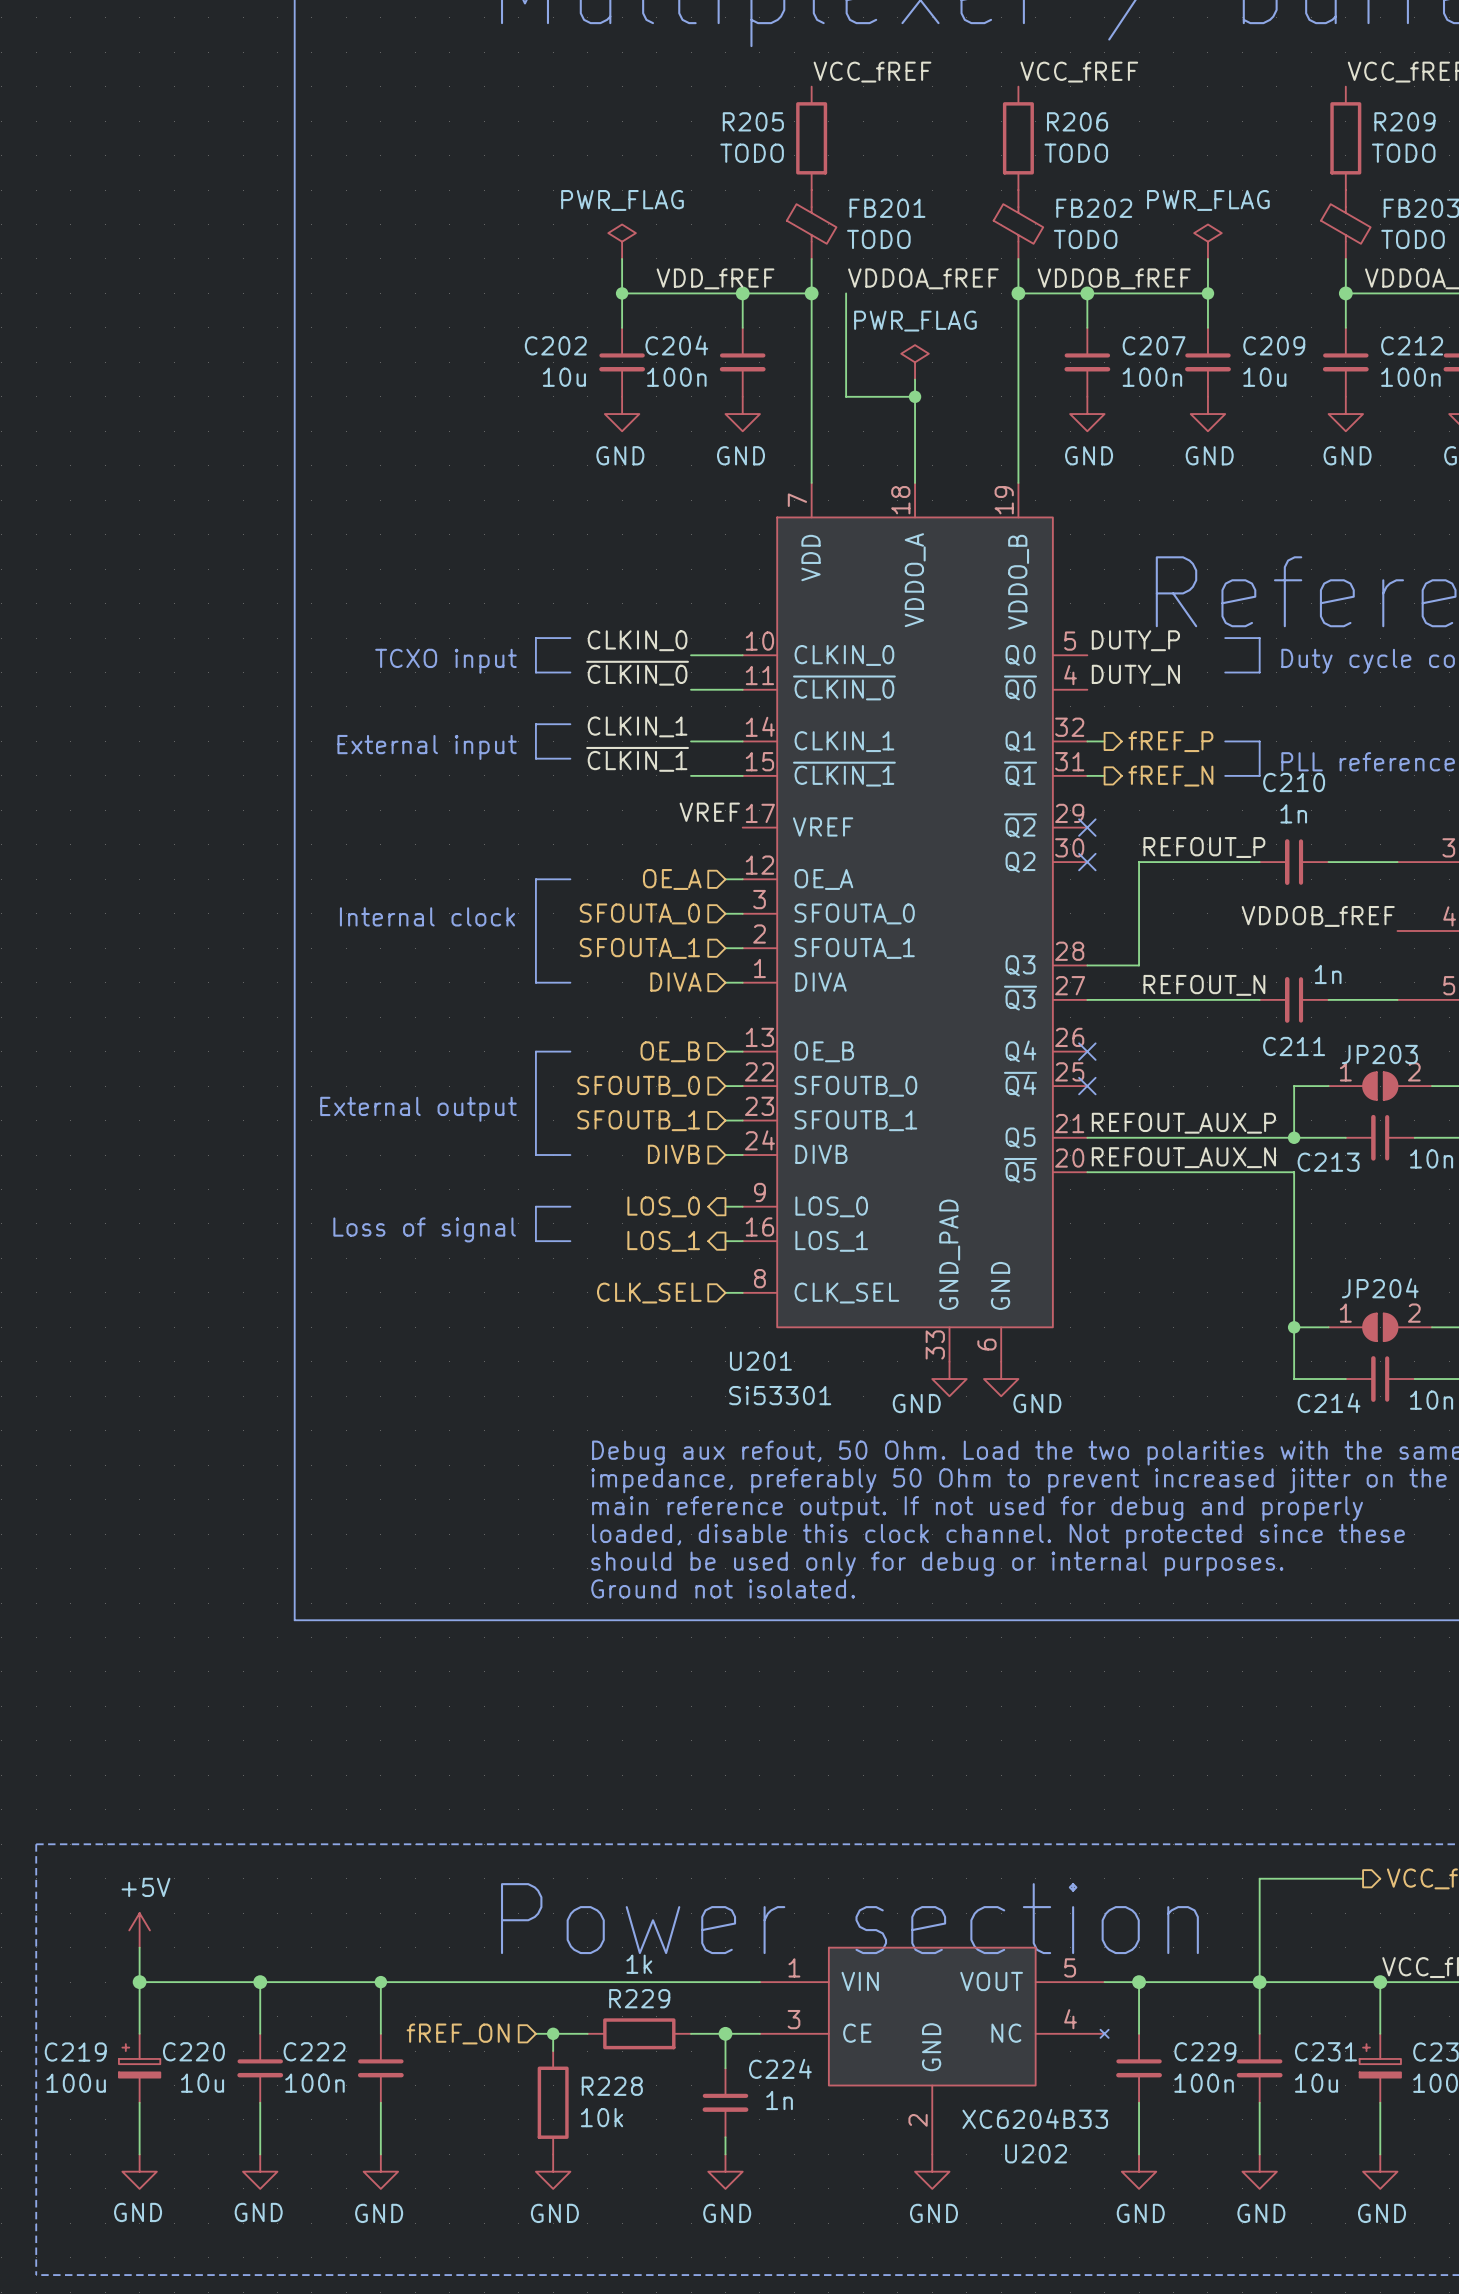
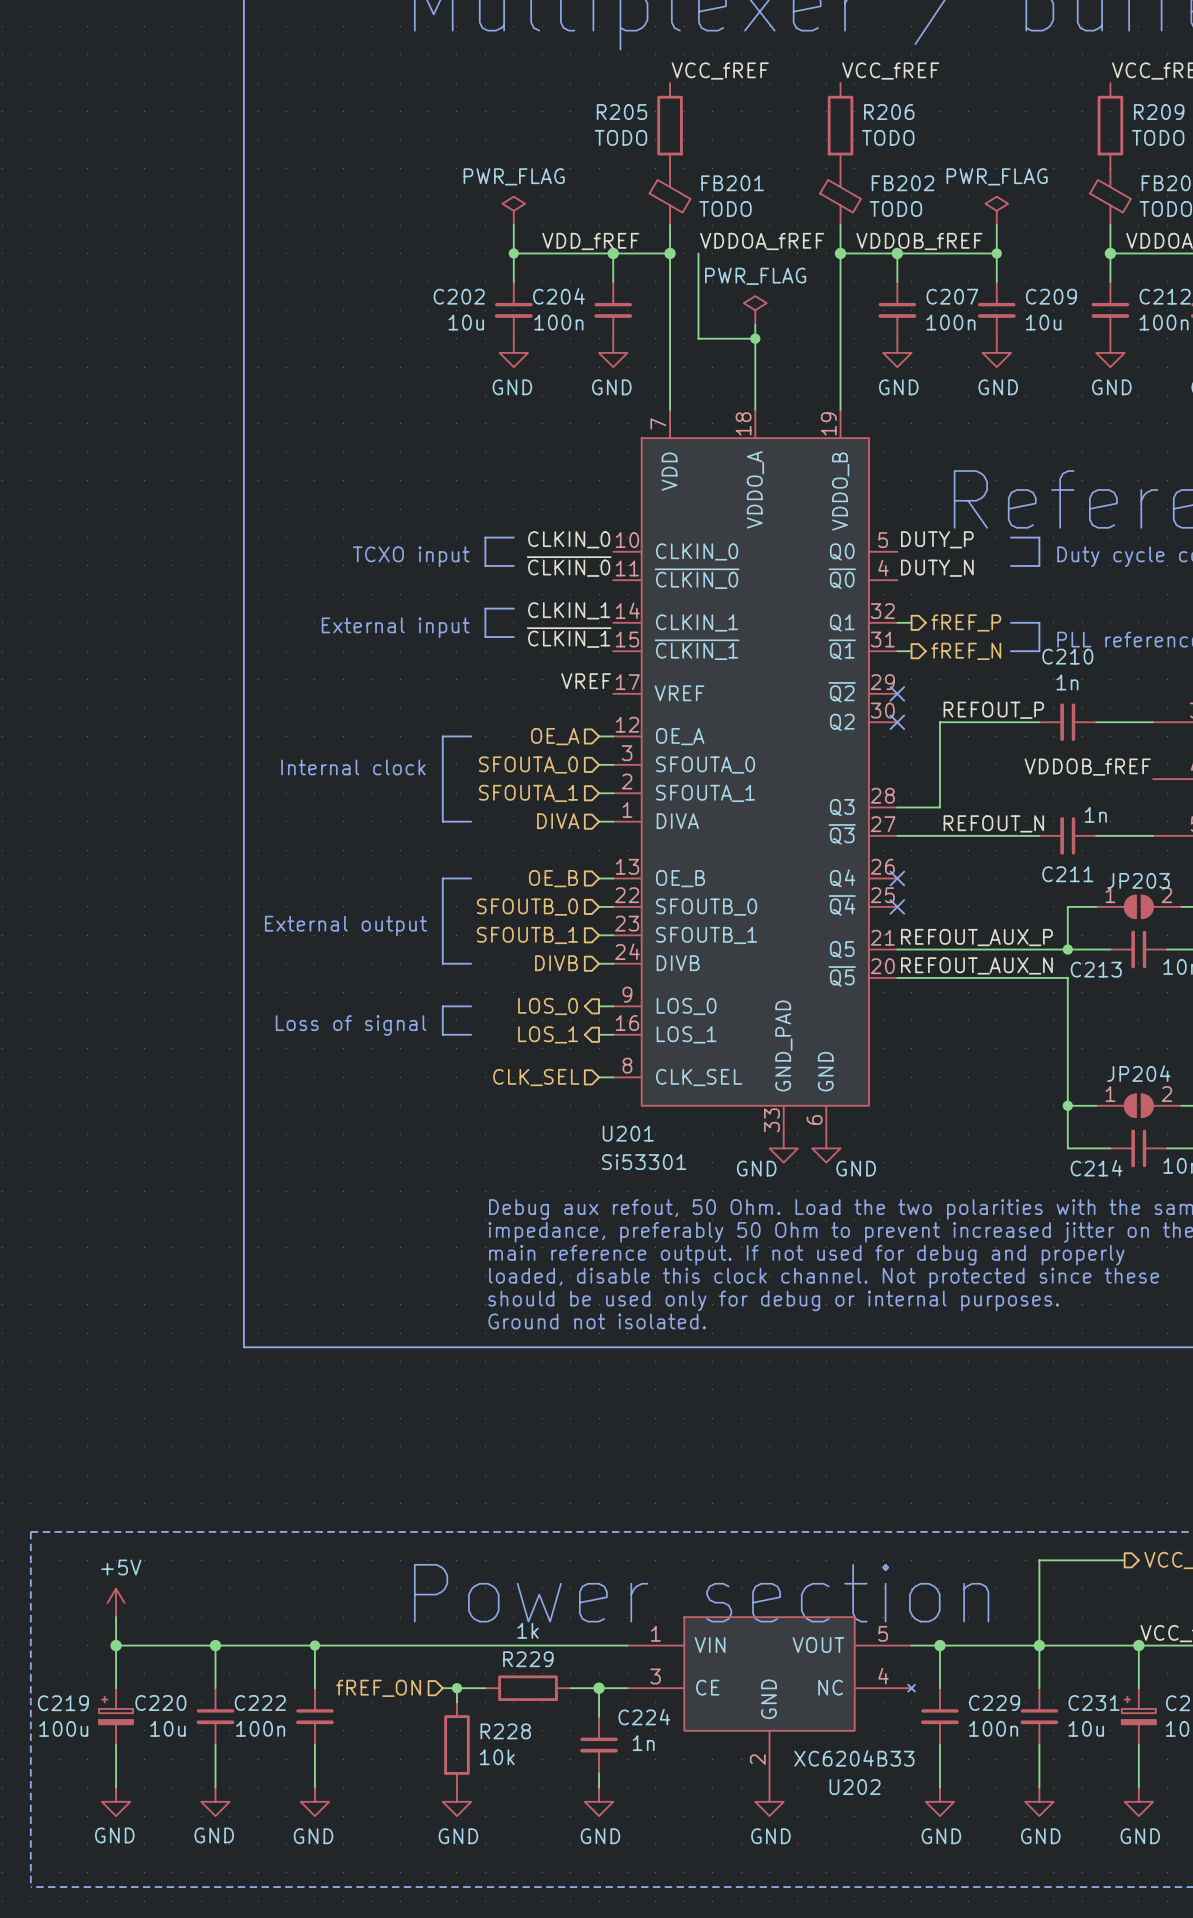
line: (570, 638) (535, 638) (535, 672) (570, 672) -> (513, 537) (485, 537) (485, 565) (513, 565)
label position: CLKIN_0 (637, 640) -> CLKIN_0 (569, 539)
wire: (691, 655) (742, 655) -> none
text position: TCXO input (445, 661) -> TCXO input (411, 556)
label position: ~{CLKIN_0} (637, 673) -> ~{CLKIN_0} (569, 566)
wire: (691, 689) (742, 689) -> none
line: (570, 724) (535, 724) (535, 758) (570, 758) -> (513, 608) (485, 608) (485, 637) (513, 637)
label position: CLKIN_1 (637, 726) -> CLKIN_1 (569, 610)
wire: (691, 741) (742, 741) -> none
text position: External input (427, 747) -> External input (395, 627)
label position: ~{CLKIN_1} (637, 759) -> ~{CLKIN_1} (569, 637)
wire: (691, 775) (742, 775) -> none

